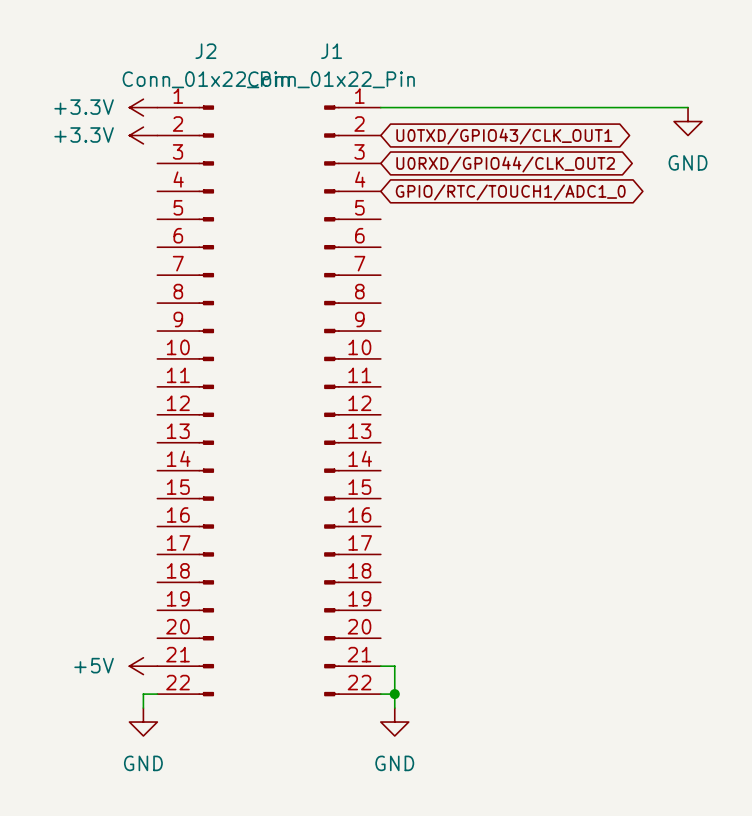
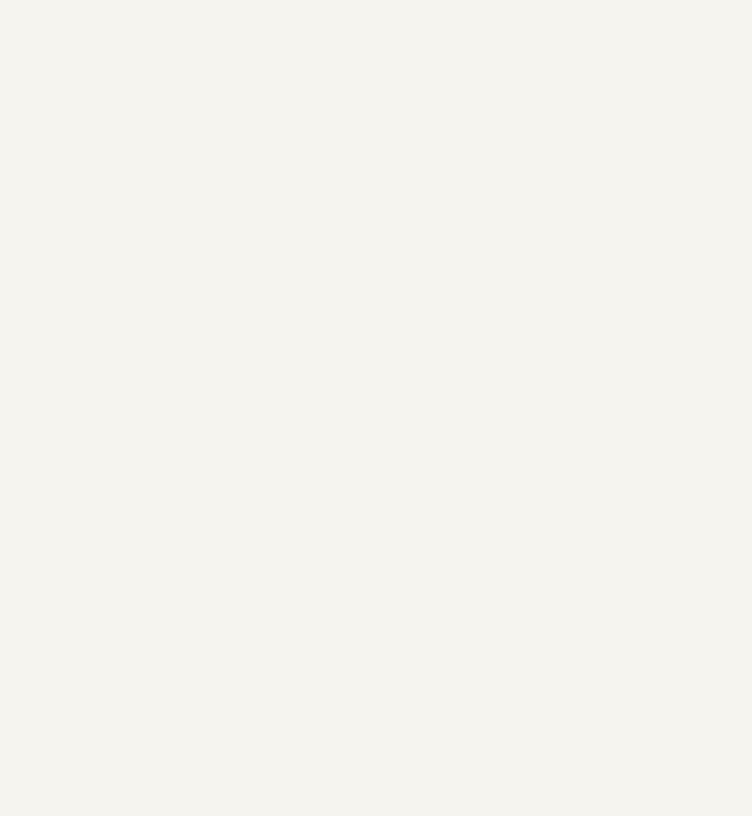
power symbol: +3.3V (143, 107) -> none
wire: (380, 107) (688, 107) -> none
power symbol: GND (688, 121) -> none
power symbol: +3.3V (143, 135) -> none
global label: U0TXD/GPIO43/CLK_OUT1 (504, 136) -> none
global label: U0RXD/GPIO44/CLK_OUT2 (505, 164) -> none
global label: GPIO/RTC/TOUCH1/ADC1_0 (510, 192) -> none
J2: Conn_01x22_Pin (185, 400) -> none
J1: Conn_01x22_Pin (352, 400) -> none
power symbol: +5V (143, 666) -> none
wire: (380, 666) (394, 666) (394, 708) -> none
wire: (157, 694) (143, 694) (143, 708) -> none
wire: (380, 694) (394, 694) -> none
junction: (394, 694) -> none
power symbol: GND (143, 722) -> none
power symbol: GND (394, 722) -> none

